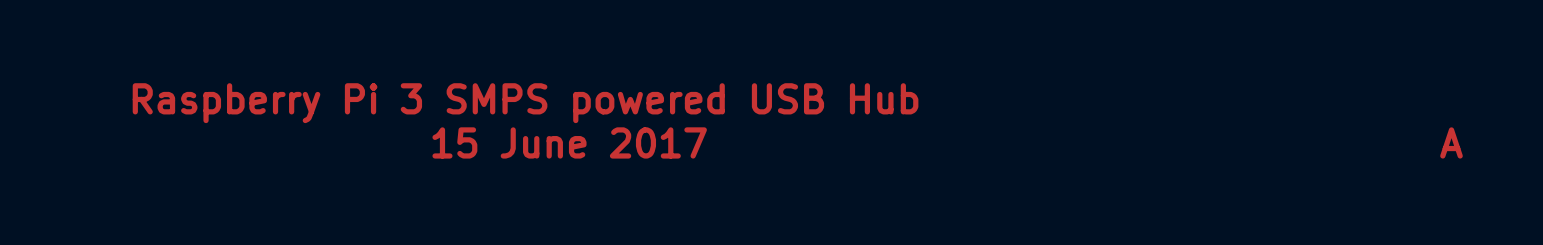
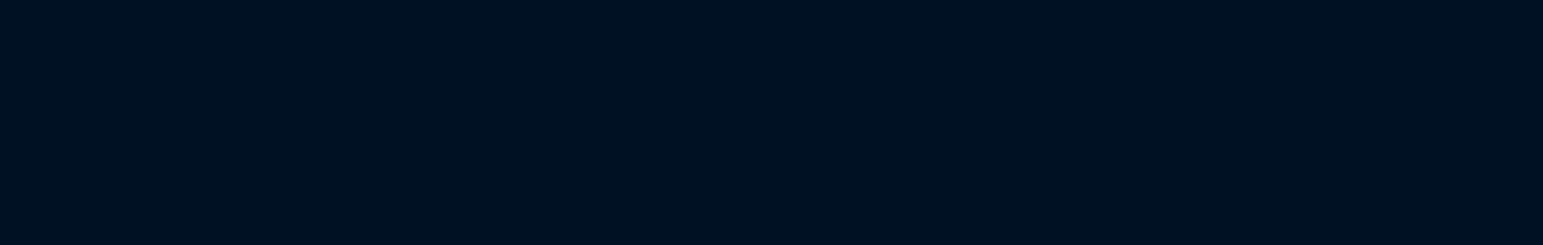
text: Raspberry Pi 3 SMPS powered USB Hub (525, 103) -> none
text: 15 June 2017 (569, 142) -> none
text: A (1451, 142) -> none

